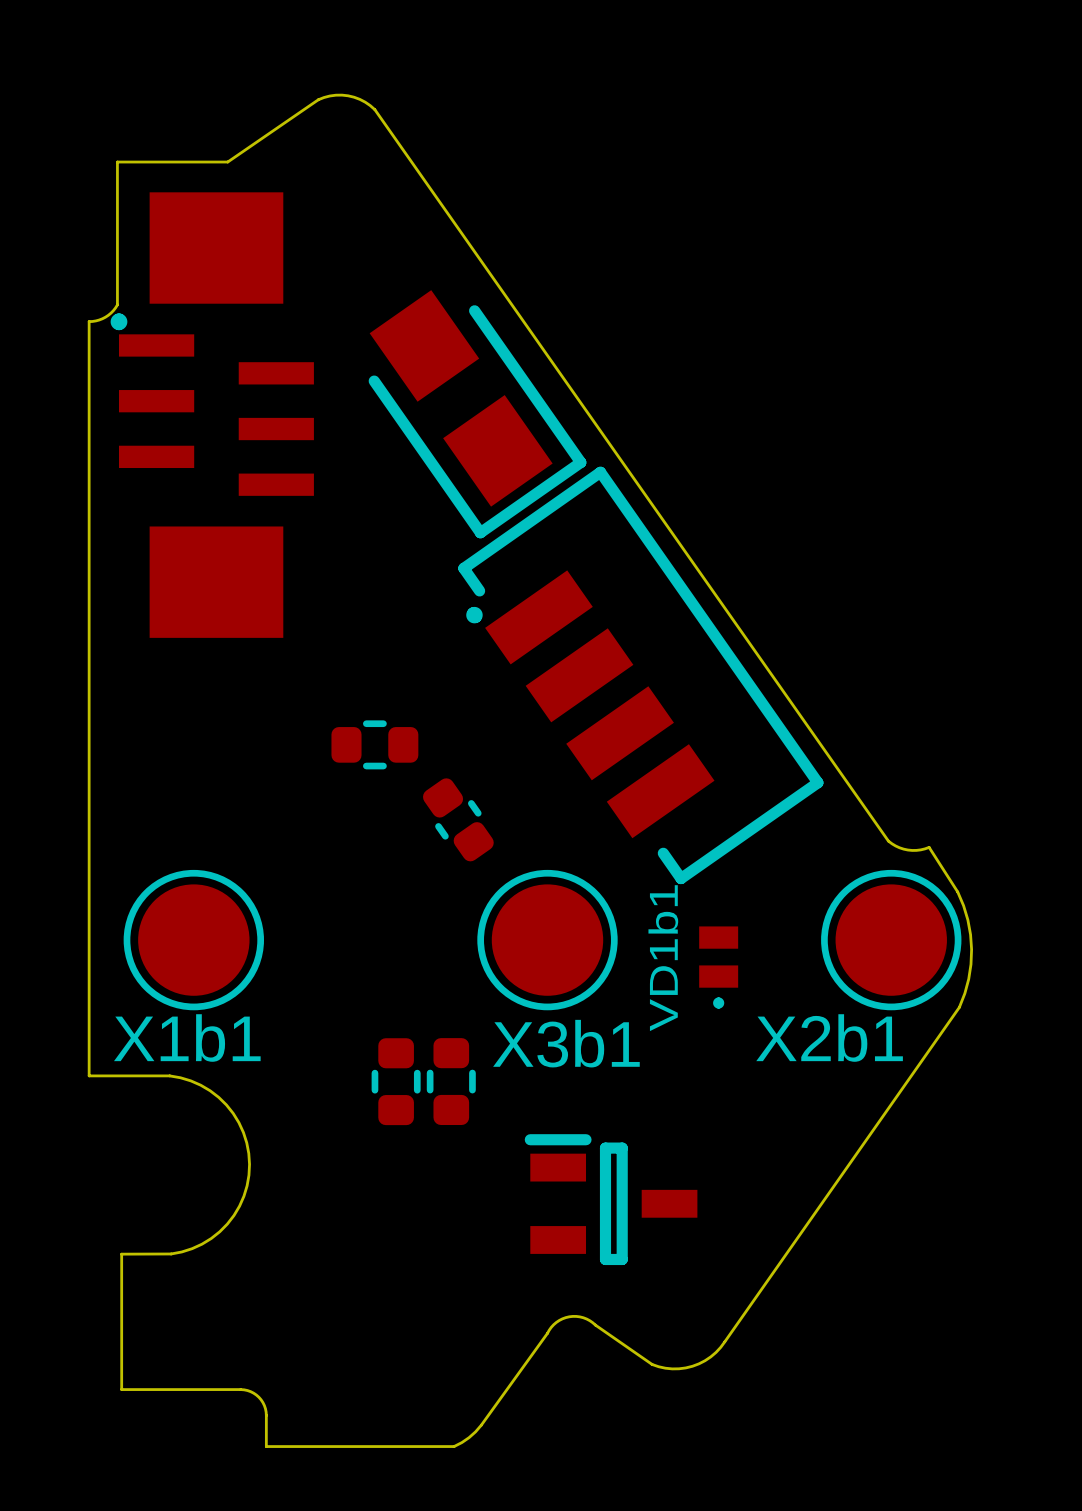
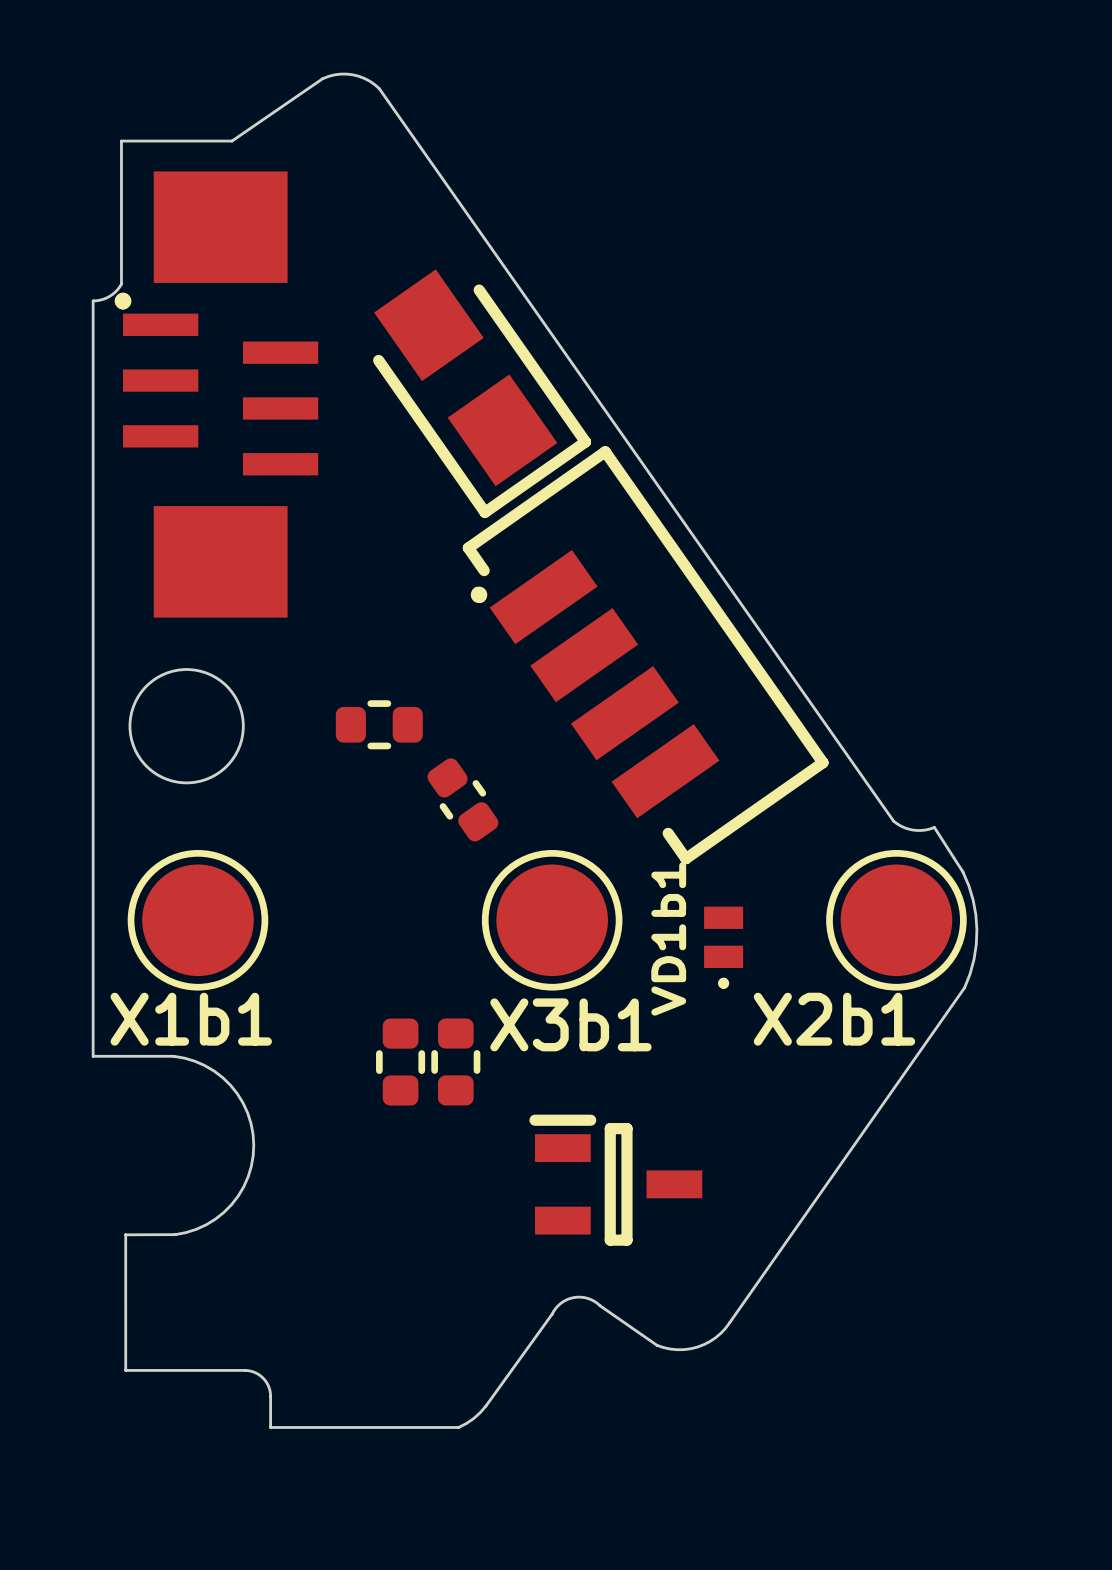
round board edge: none -> [128, 668, 245, 785]

